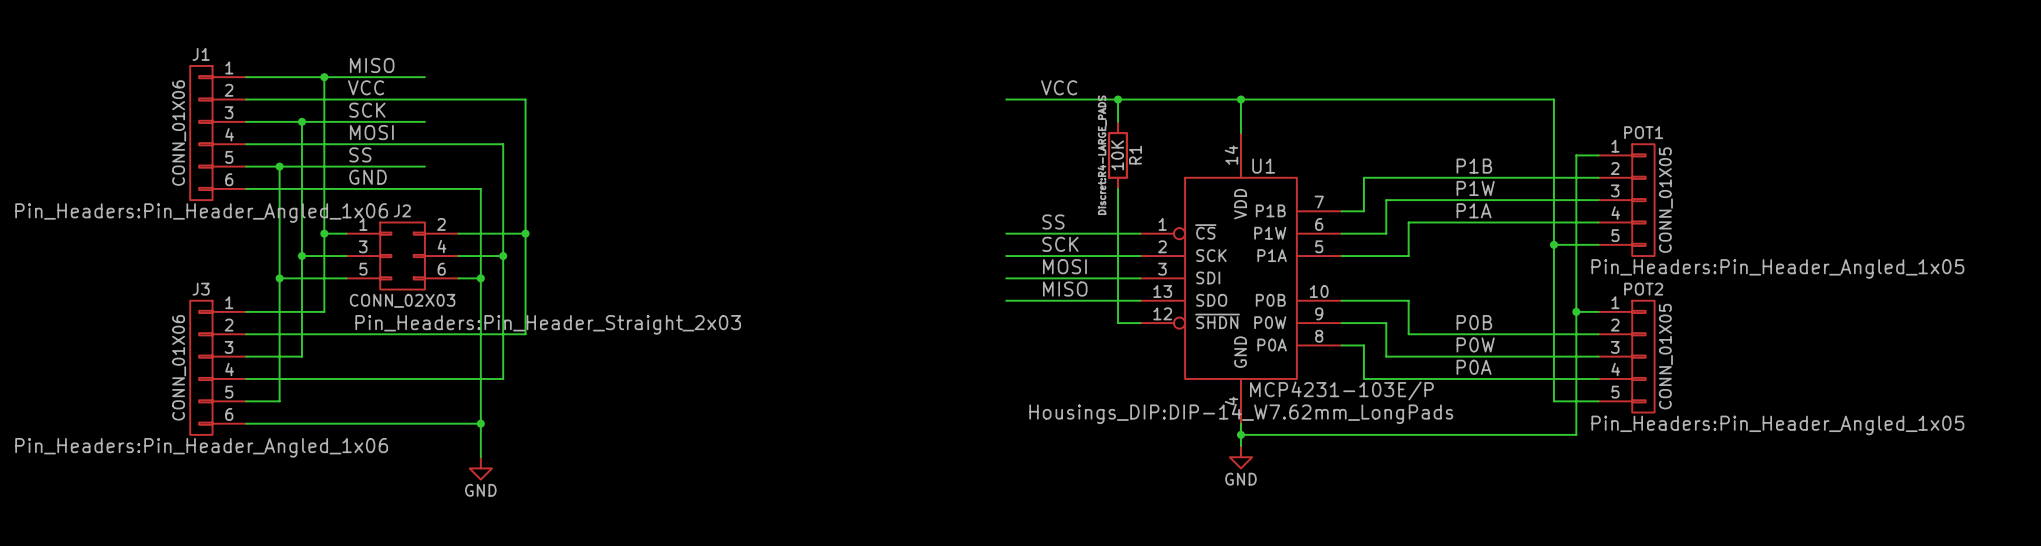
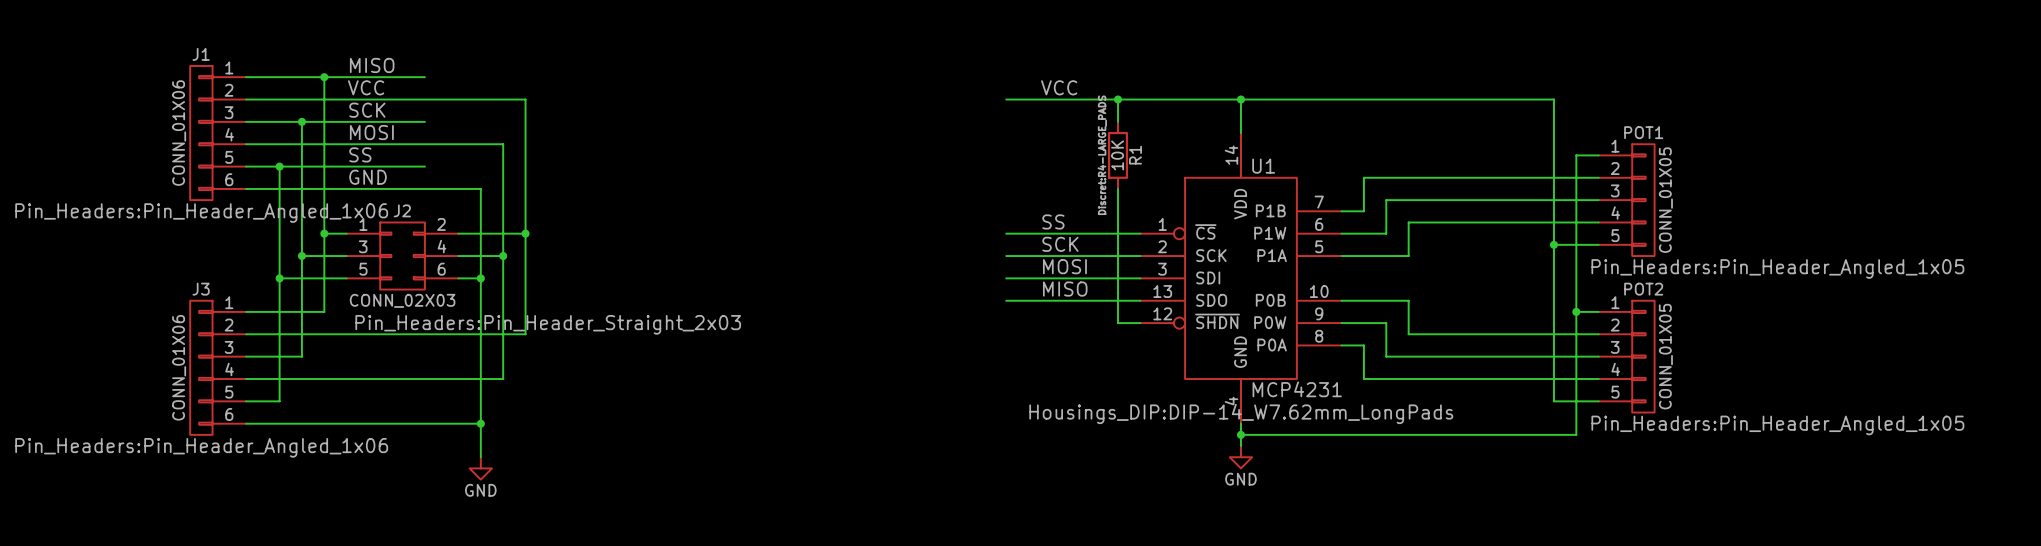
label: P1B (1474, 166) -> none
label: P1W (1475, 188) -> none
label: P1A (1474, 210) -> none
label: P0B (1474, 322) -> none
label: P0W (1475, 344) -> none
label: P0A (1474, 367) -> none
U1 value: MCP4231-103E/P (1341, 390) -> MCP4231 (1297, 389)

